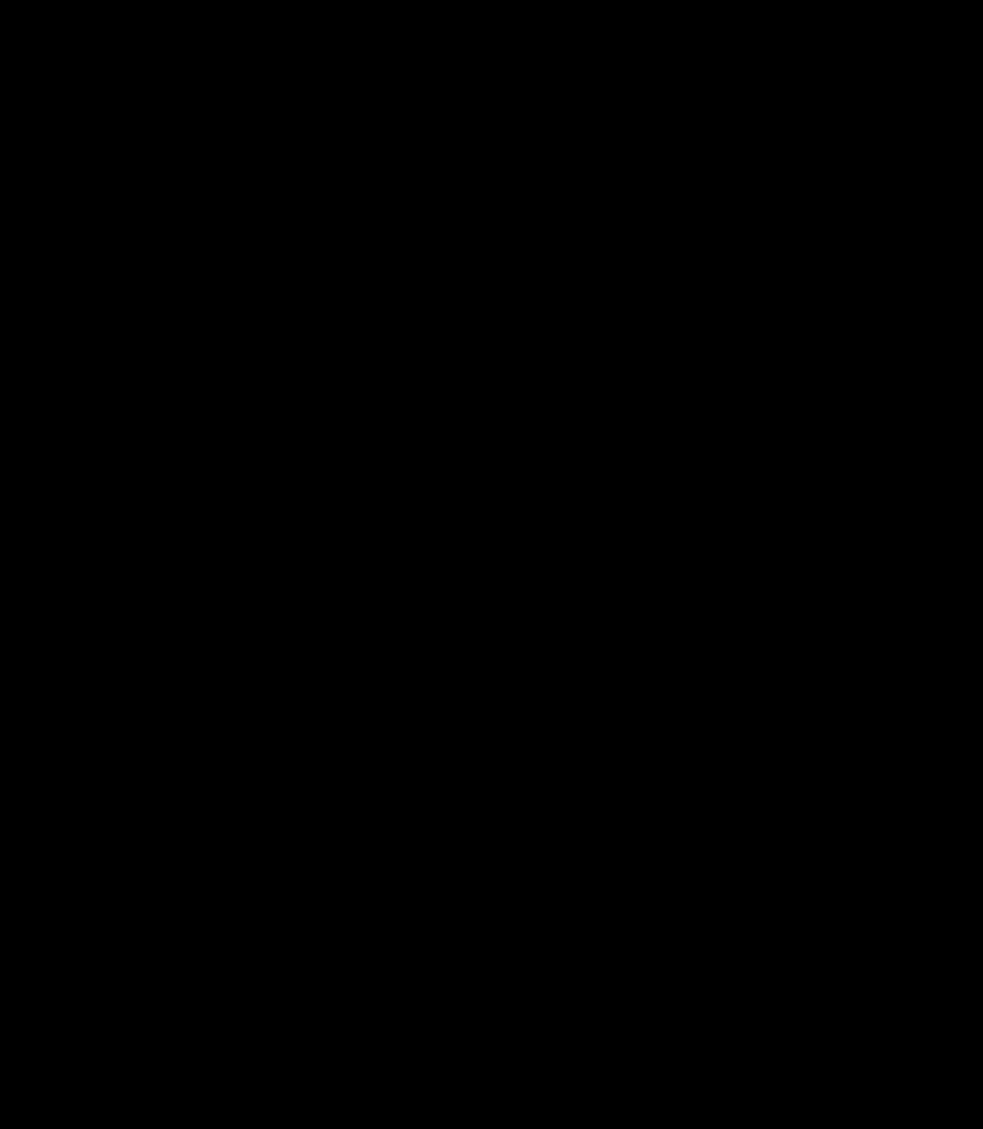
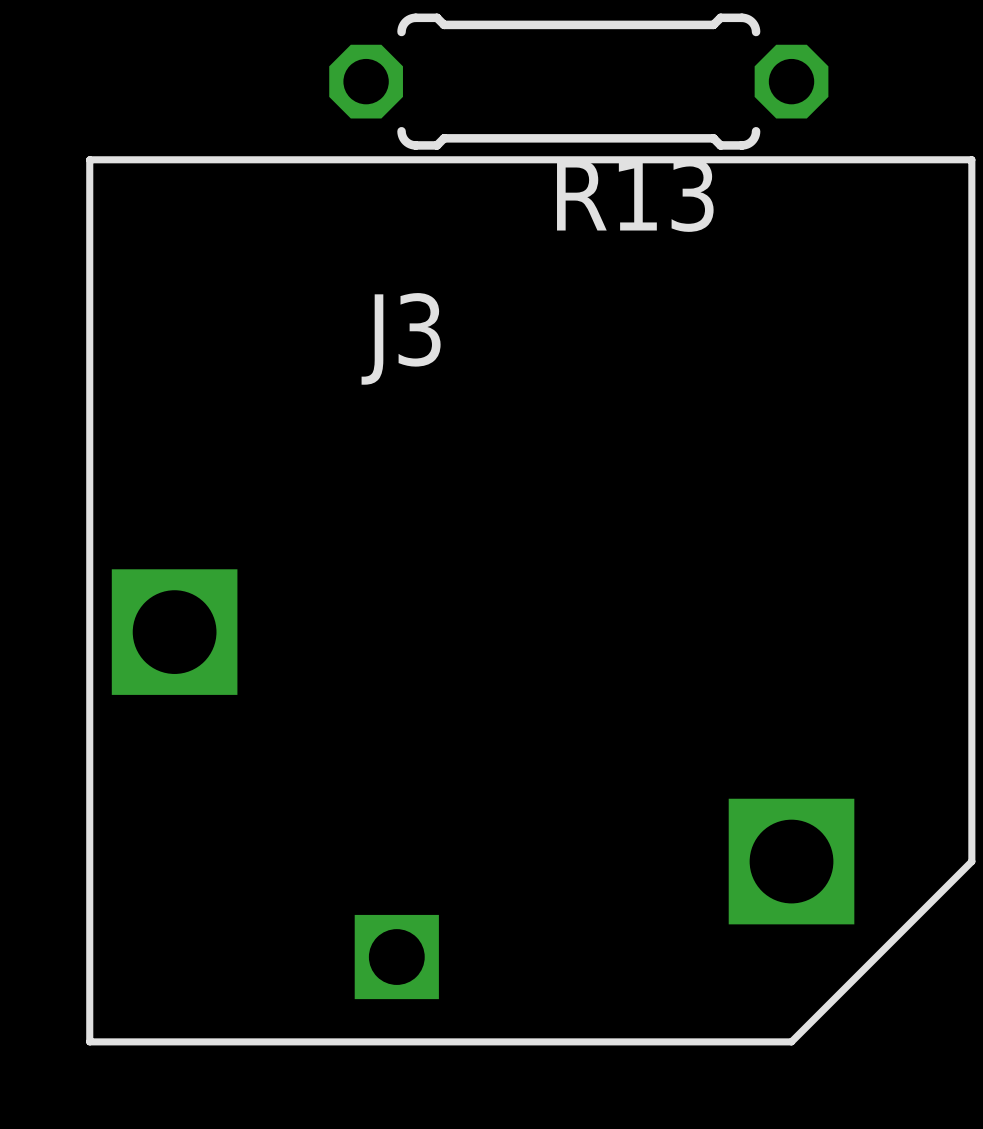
R13: none -> (578, 81)
J3: none -> (530, 600)

